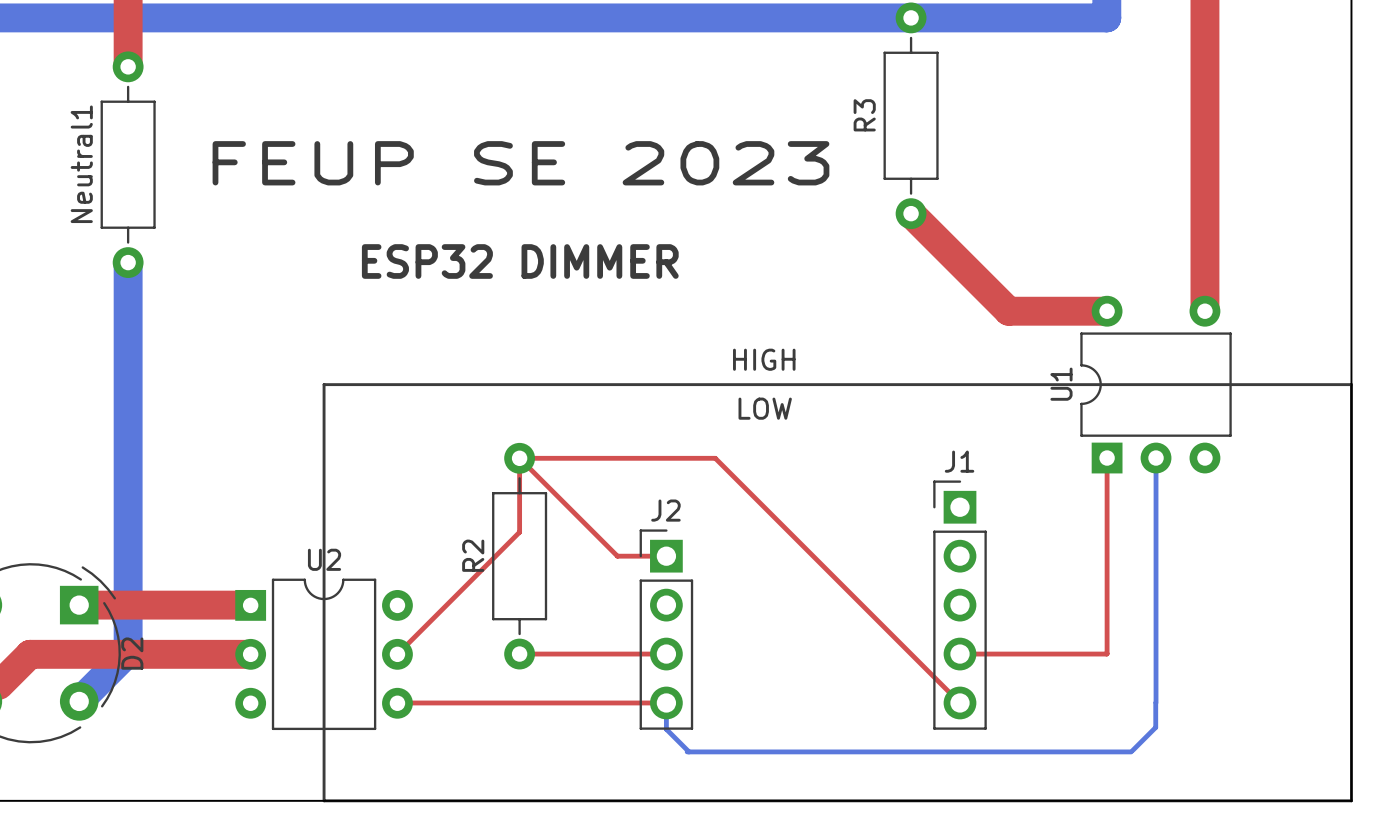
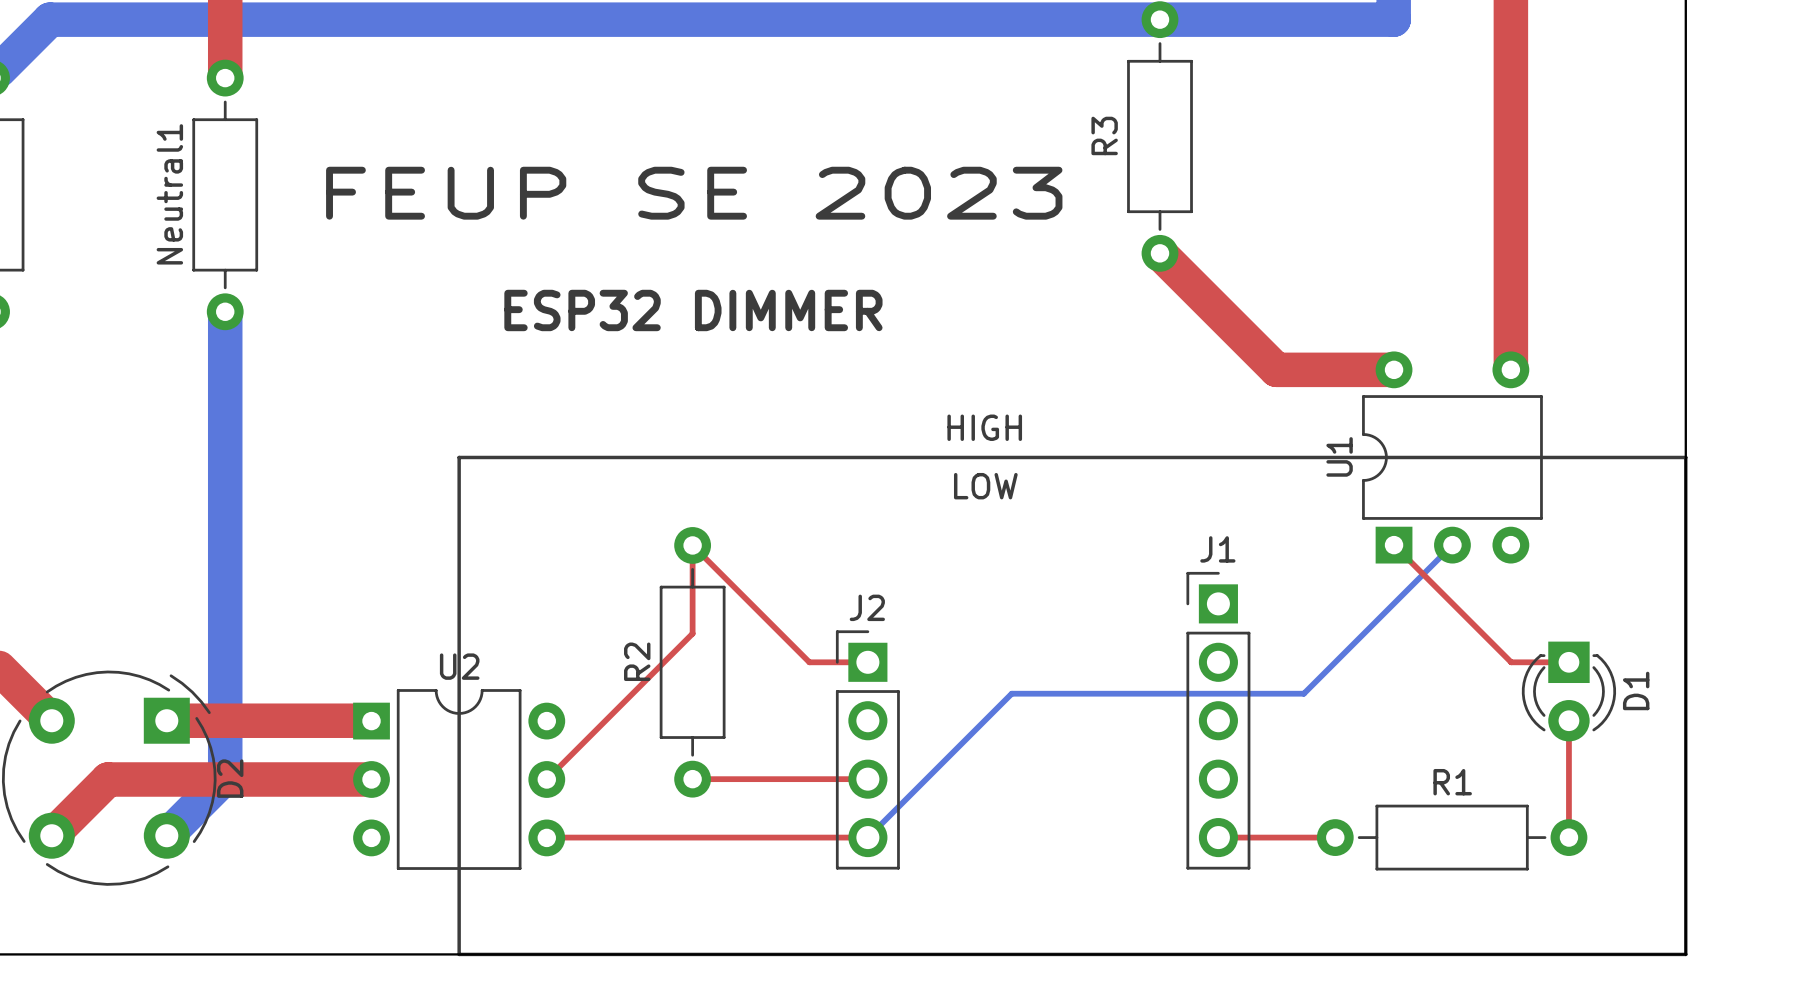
top track: (519, 458) (715, 458) (960, 702) -> (1335, 837) (1218, 837)
top track: (1107, 458) (1107, 653) (960, 654) -> (1394, 545) (1511, 662) (1568, 662)
bottom track: (1156, 458) (1156, 702) -> (1452, 545) (1303, 693) (1011, 693) (867, 837)
D1: none -> (1568, 691)
top track: none -> (1568, 720) (1568, 837)
bottom track: (666, 702) (666, 729) (689, 751) -> none
bottom track: (1155, 702) (1155, 727) (1132, 750) -> none
R1: none -> (1452, 837)
bottom track: (687, 751) (1131, 751) -> none

